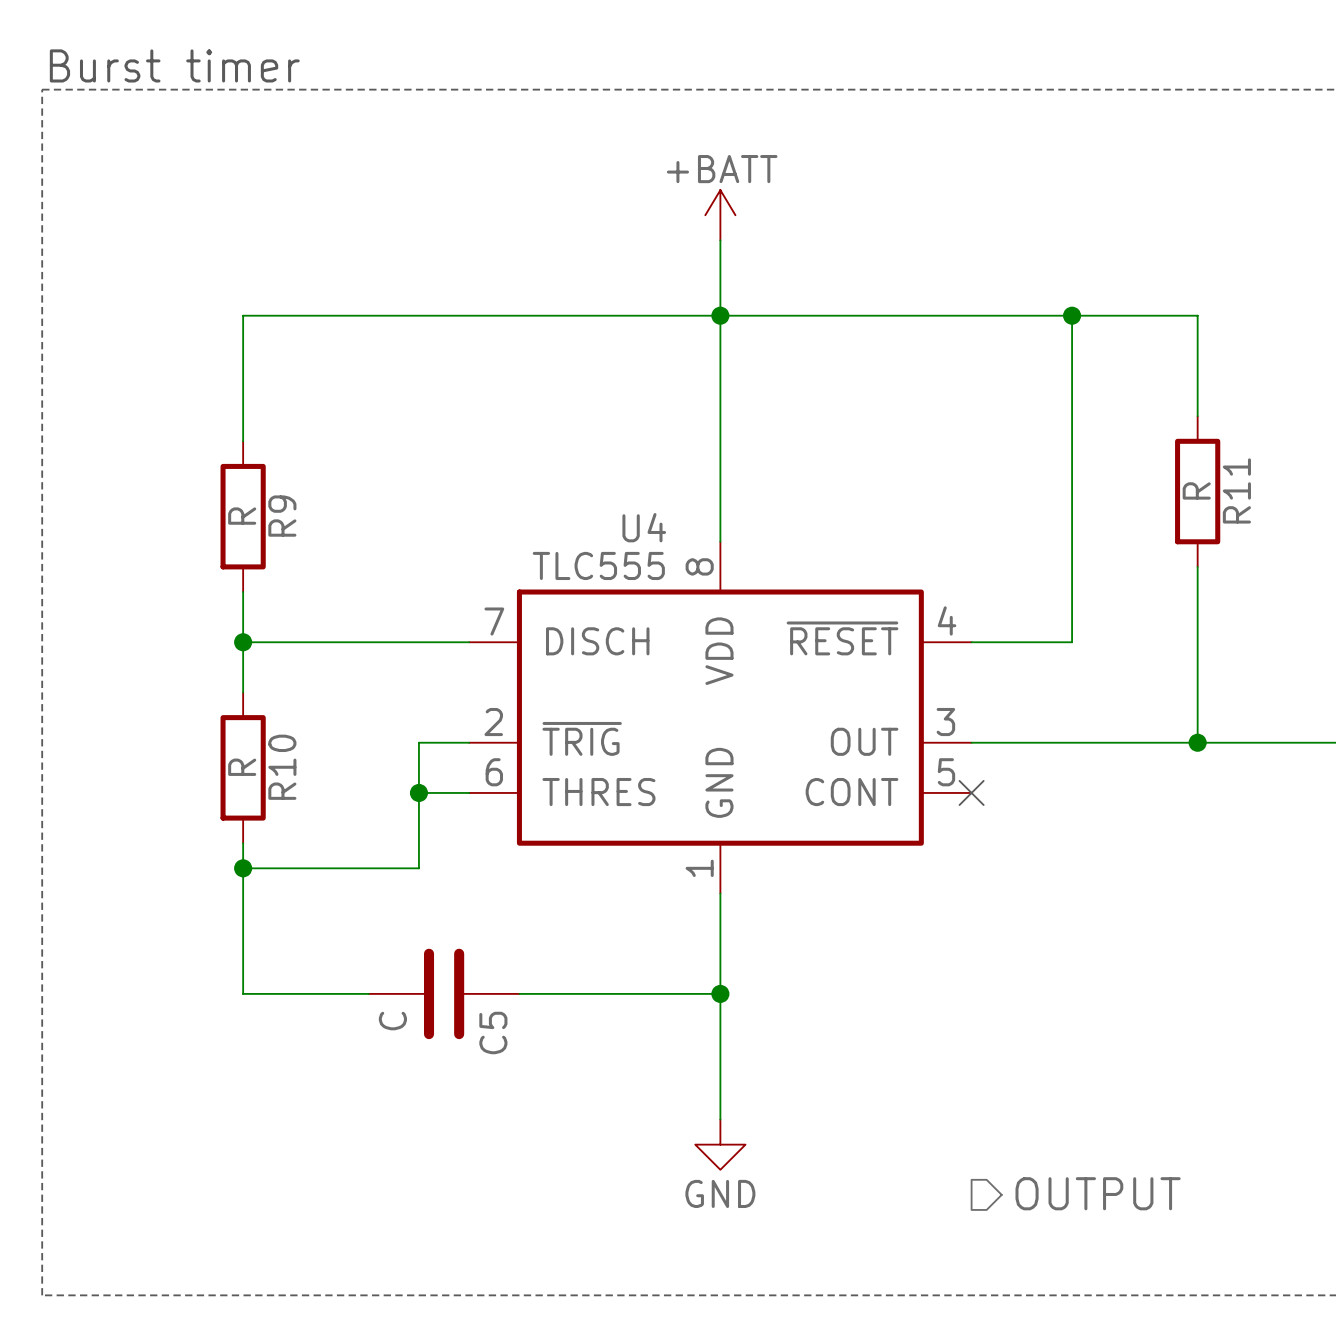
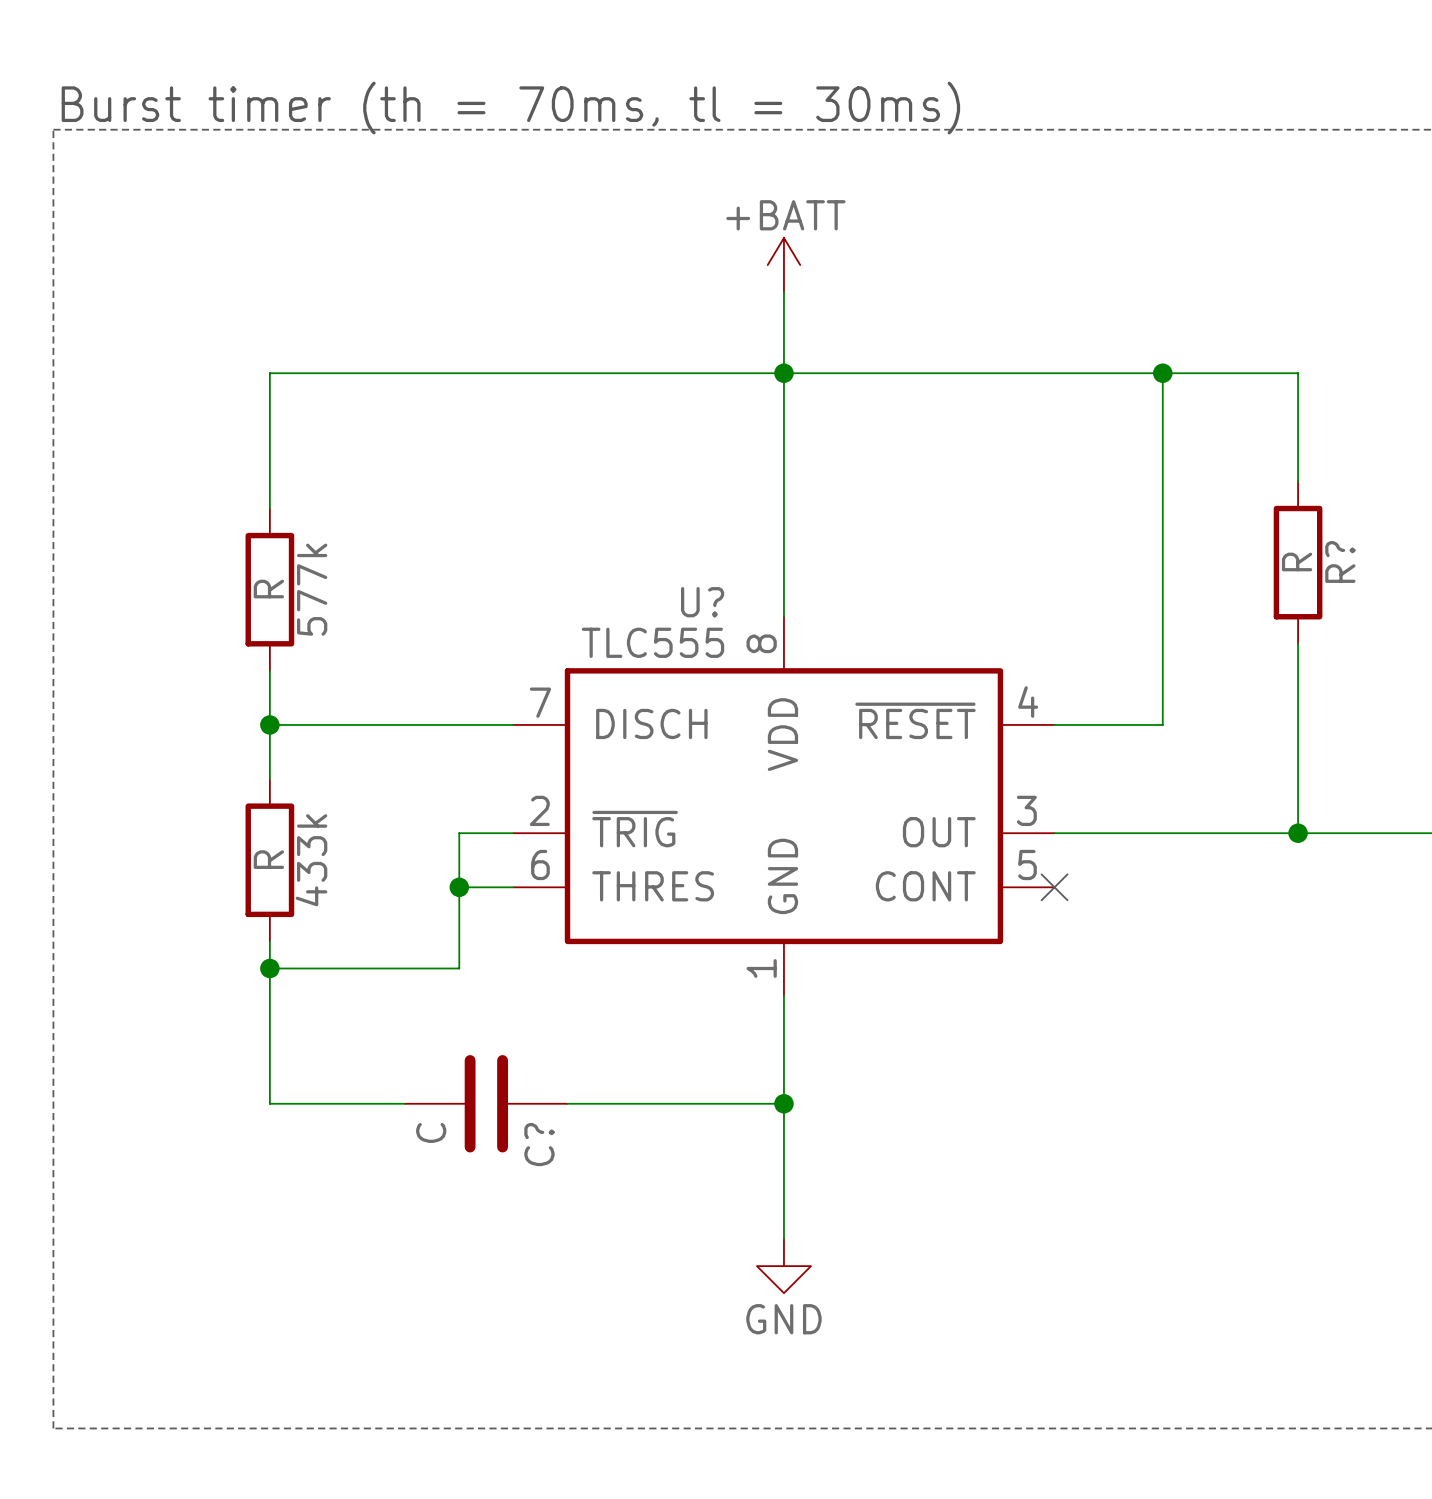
text: Burst timer (174, 65) -> Burst timer (th = 70ms, tl = 30ms) (510, 108)
R11 name: R11 (1236, 490) -> R? (1340, 561)
R9 name: R9 (282, 516) -> 577k (312, 589)
U4 name: U4 (644, 527) -> U? (702, 602)
R10 name: R10 (282, 767) -> 433k (311, 860)
C5 name: C5 (493, 1032) -> C? (539, 1144)
hierarchical label: OUTPUT (1098, 1193) -> none

